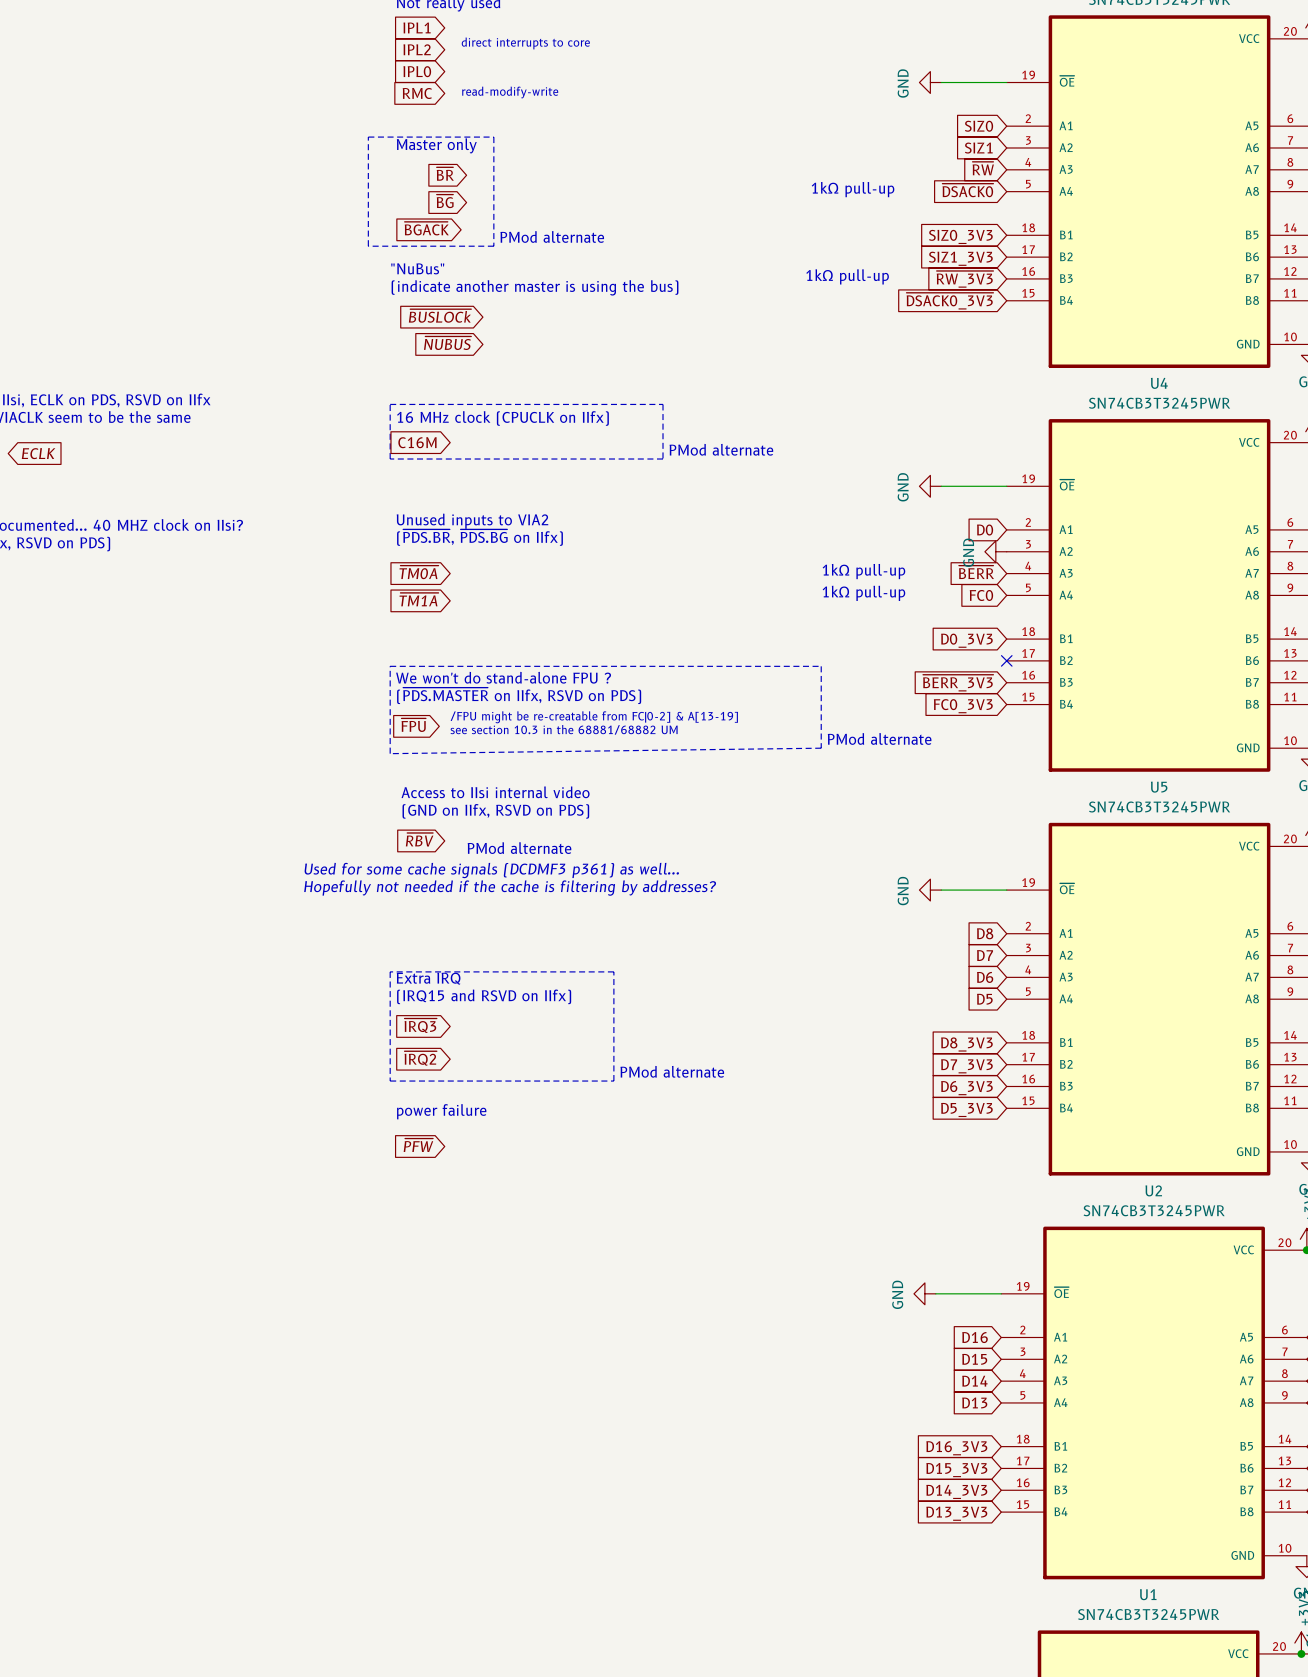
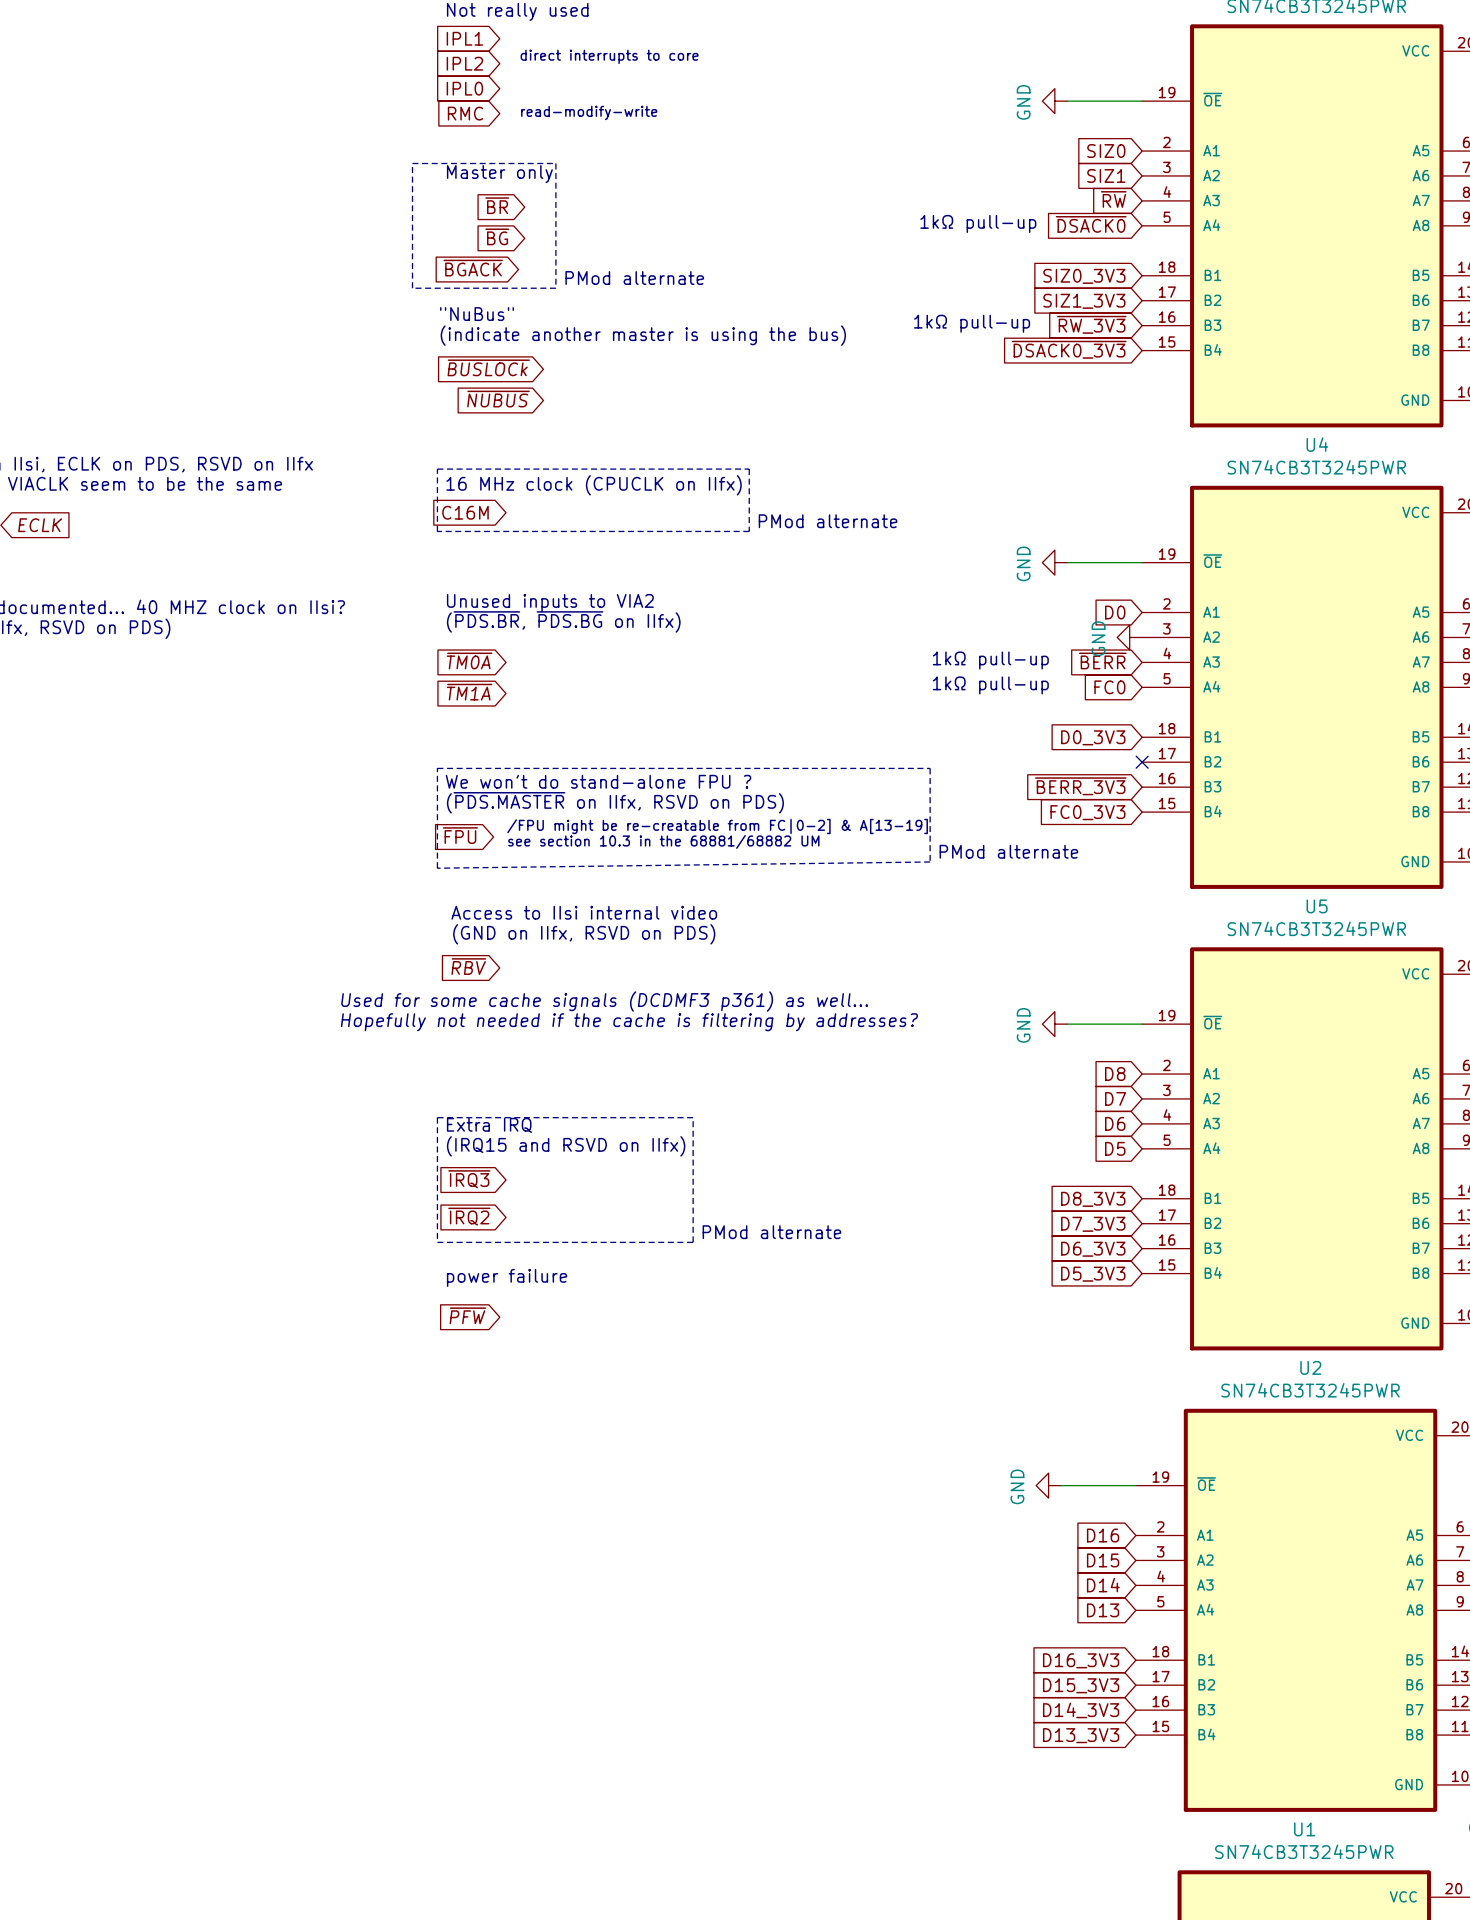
text: PMod alternate (519, 848) -> none

